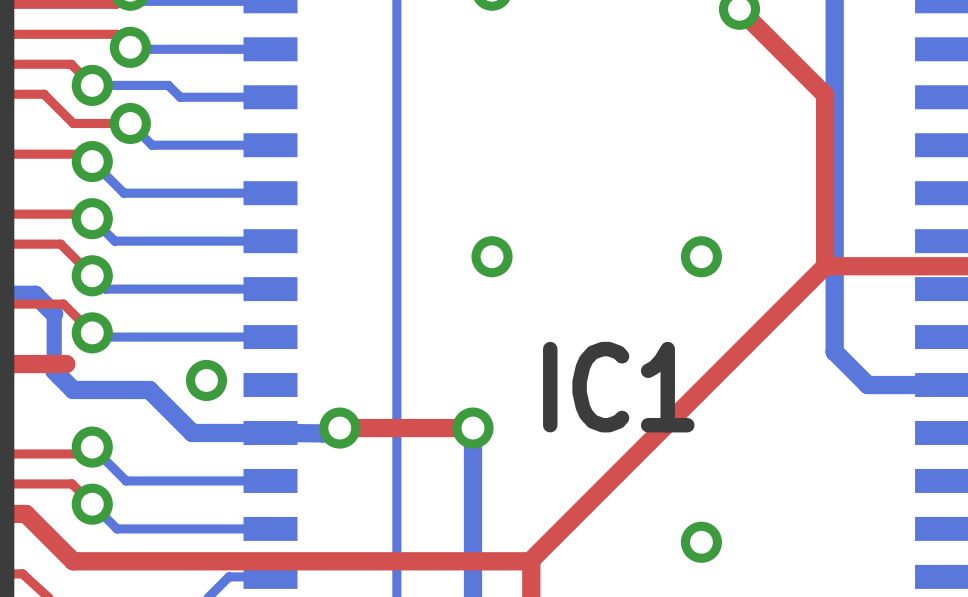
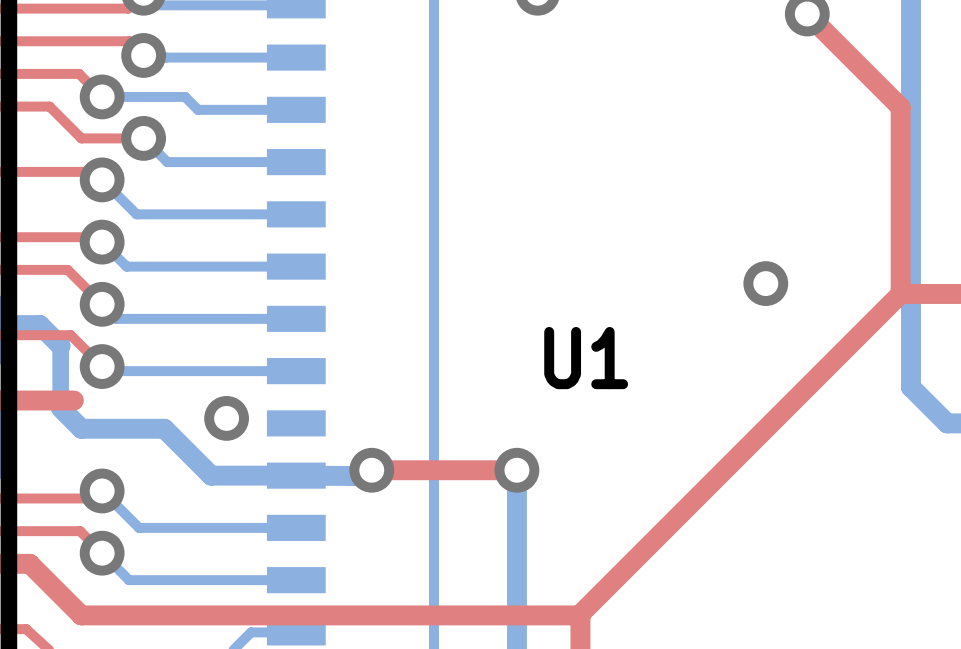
via: (492, 256) -> none
IC1 name: IC1 (618, 387) -> U1 (586, 358)
via: (701, 542) -> none

